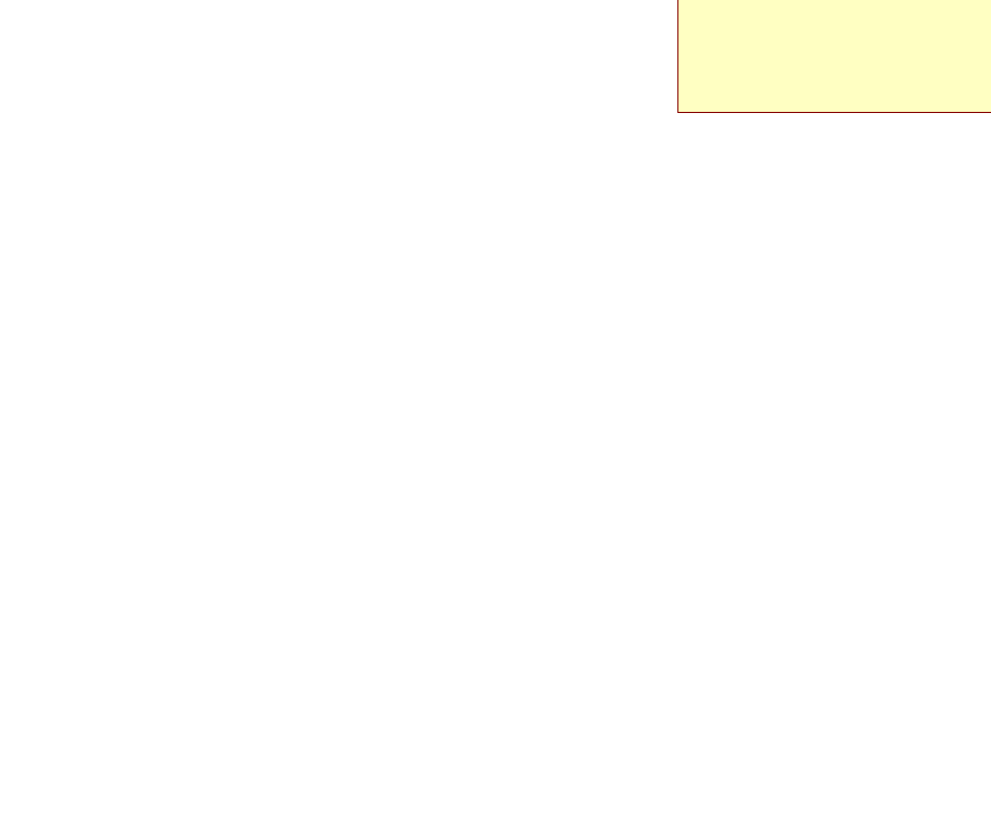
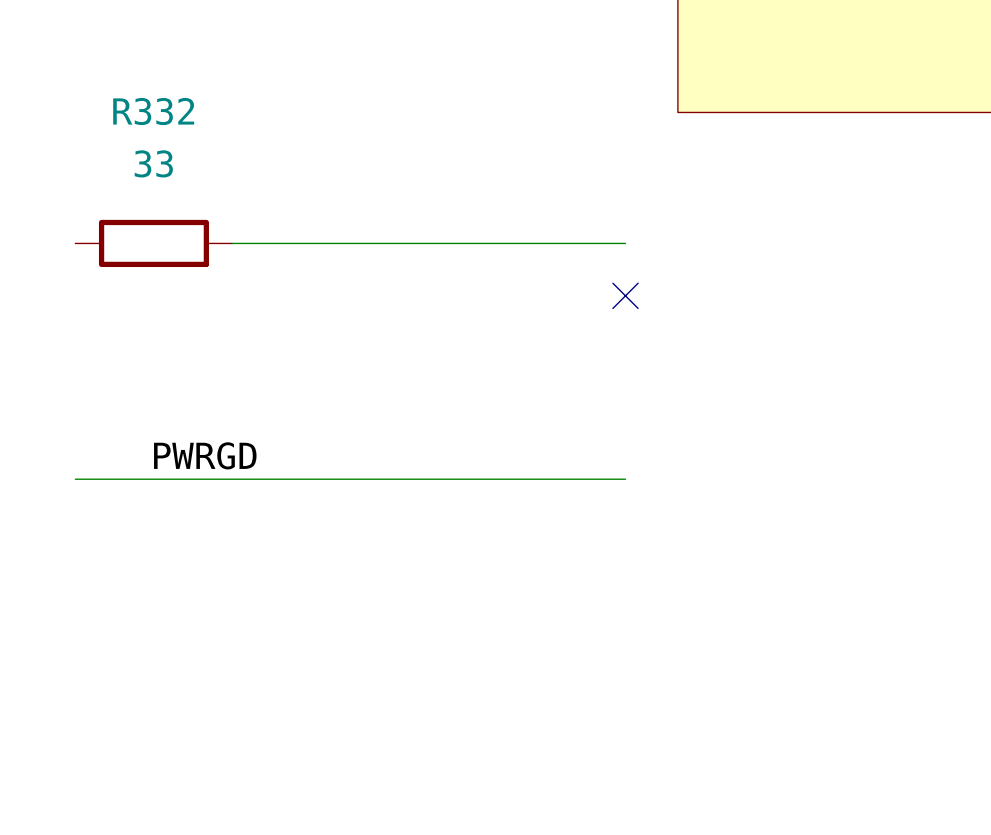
R332: none -> 33 (153, 243)
wire: none -> (232, 243) (625, 243)
no-connect mark: none -> (625, 295)
label: none -> PWRGD (205, 455)
wire: none -> (75, 479) (625, 479)

